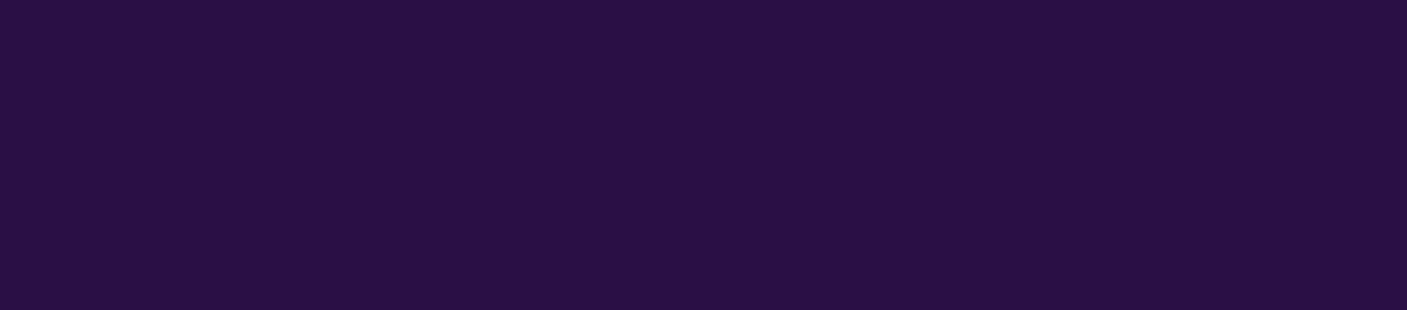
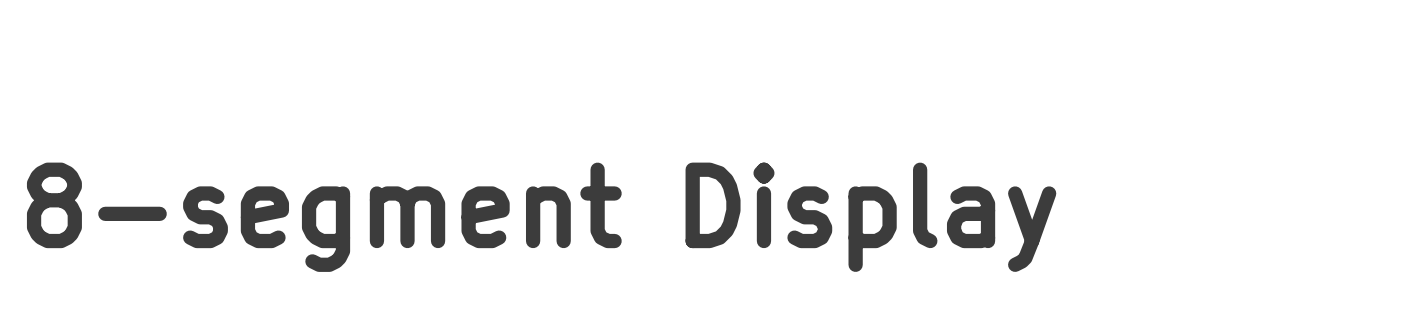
text: none -> 8-segment Display (541, 217)

